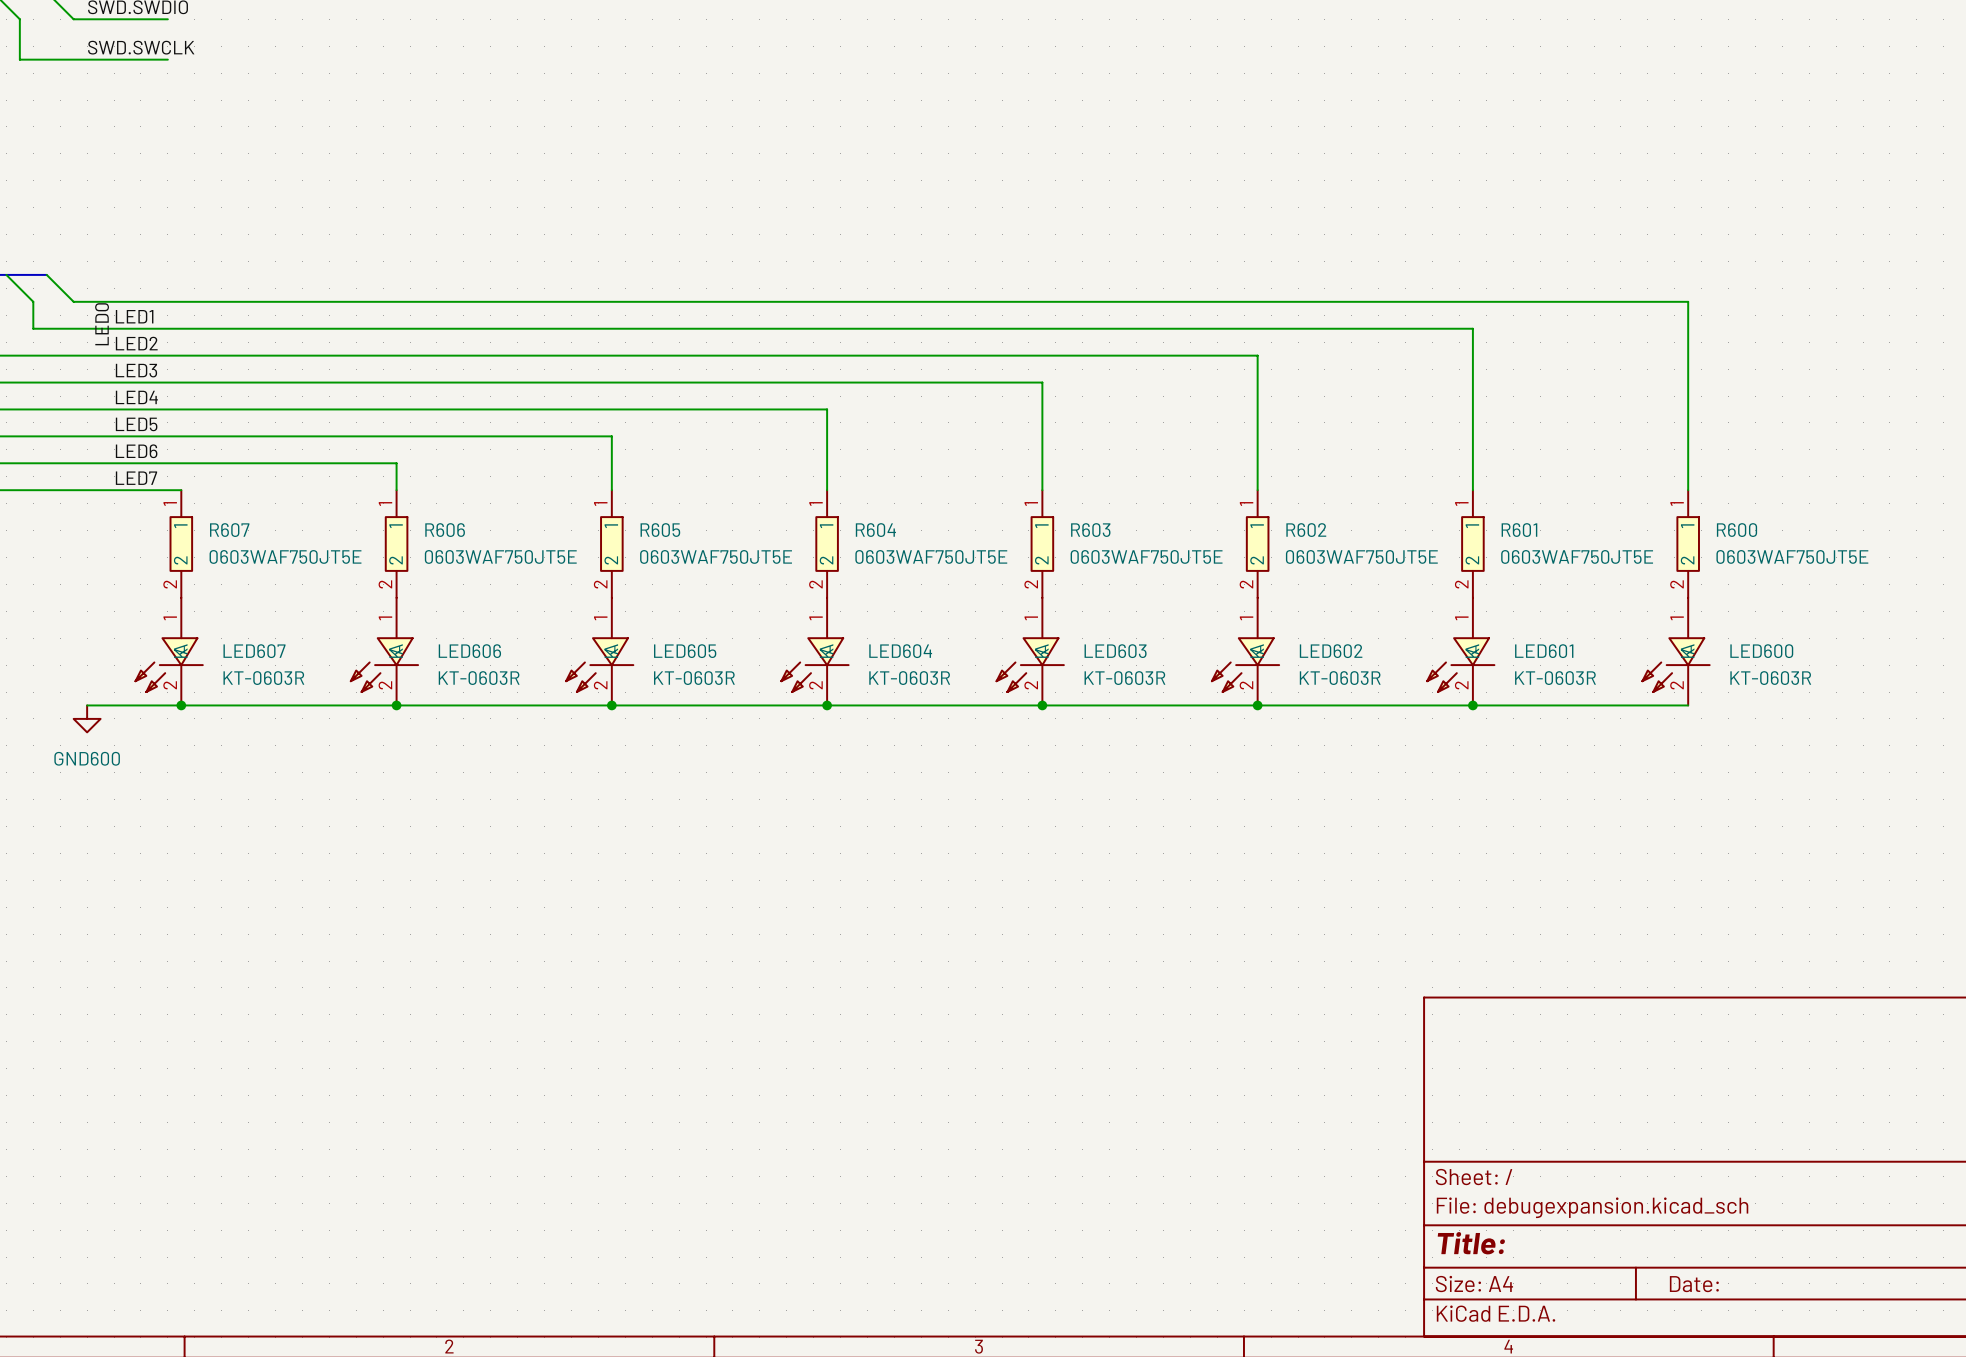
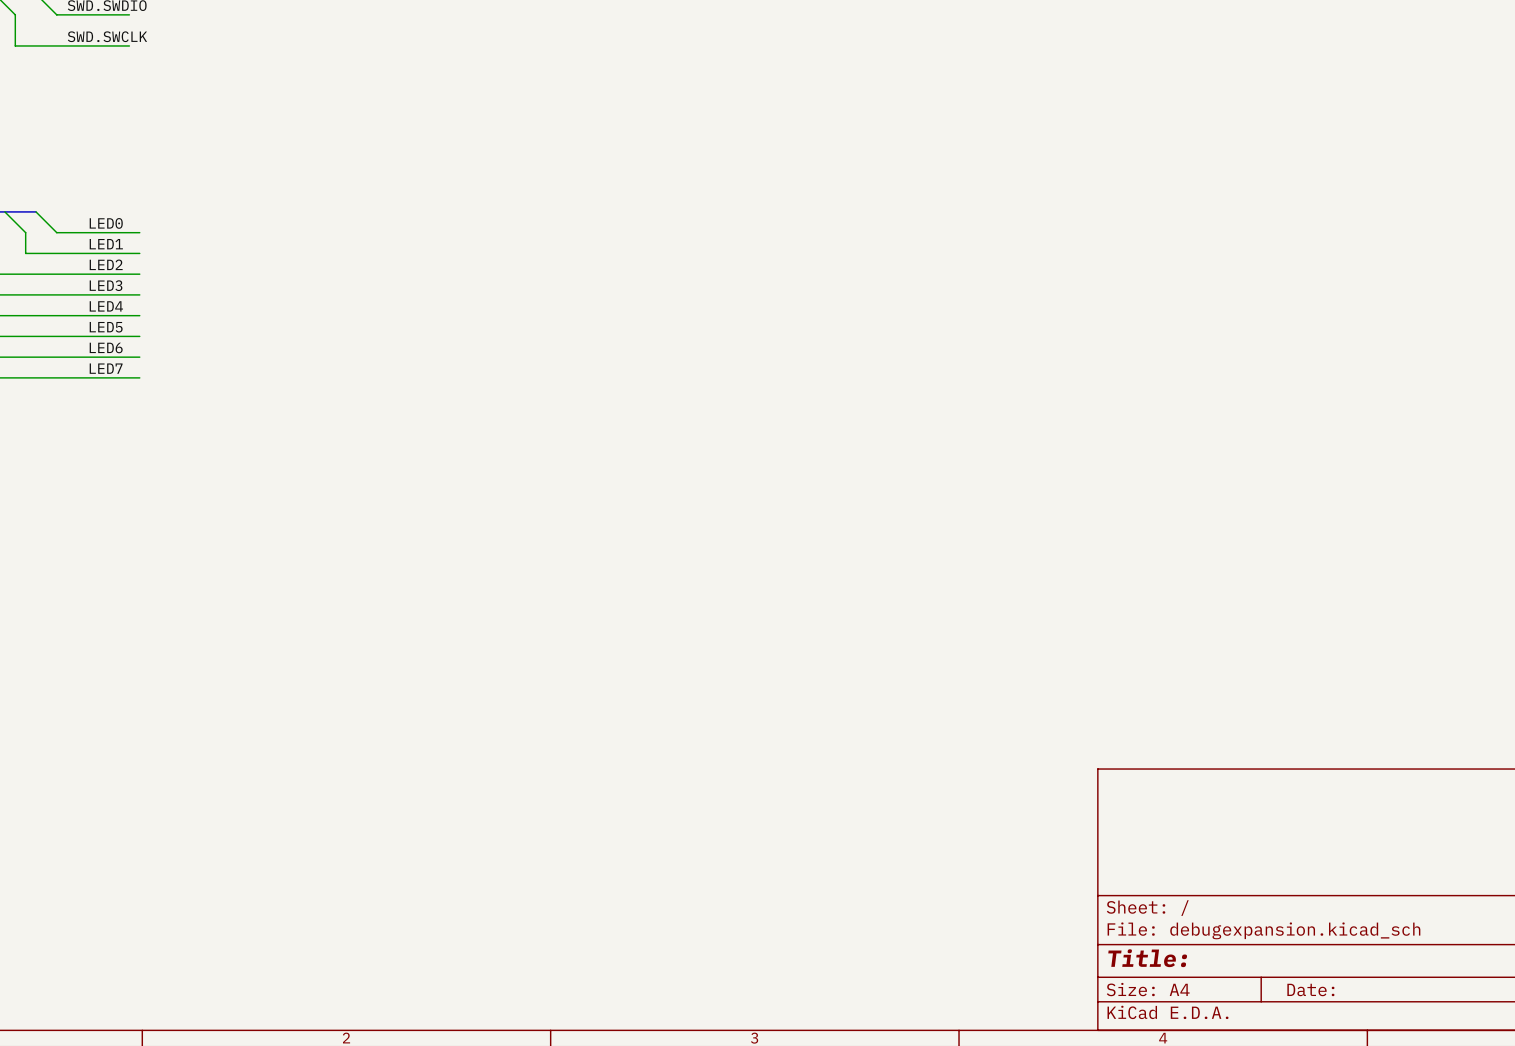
wire: (181, 301) (1688, 301) (1688, 490) -> none
label rotation: 0° (102, 324) -> 90° clockwise (106, 223)
wire: (181, 328) (1472, 328) (1472, 490) -> none
wire: (181, 355) (1257, 355) (1257, 490) -> none
wire: (181, 382) (1042, 382) (1042, 490) -> none
wire: (181, 409) (827, 409) (827, 490) -> none
wire: (181, 436) (611, 436) (611, 490) -> none
wire: (181, 463) (396, 463) (396, 490) -> none
R607: 0603WAF750JT5E (181, 544) -> none
R606: 0603WAF750JT5E (396, 544) -> none
R605: 0603WAF750JT5E (611, 544) -> none
R604: 0603WAF750JT5E (827, 544) -> none
R603: 0603WAF750JT5E (1042, 544) -> none
R602: 0603WAF750JT5E (1257, 544) -> none
R601: 0603WAF750JT5E (1472, 544) -> none
R600: 0603WAF750JT5E (1688, 544) -> none
LED607: KT-0603R (169, 651) -> none
LED606: KT-0603R (384, 651) -> none
LED605: KT-0603R (599, 651) -> none
LED604: KT-0603R (814, 651) -> none
LED603: KT-0603R (1030, 651) -> none
LED602: KT-0603R (1245, 651) -> none
LED601: KT-0603R (1460, 651) -> none
LED600: KT-0603R (1676, 651) -> none
wire: (87, 705) (1688, 705) -> none
junction: (181, 705) -> none
junction: (396, 705) -> none
junction: (611, 705) -> none
junction: (827, 705) -> none
junction: (1042, 705) -> none
junction: (1257, 705) -> none
junction: (1472, 705) -> none
power symbol: GND600 (87, 718) -> none

